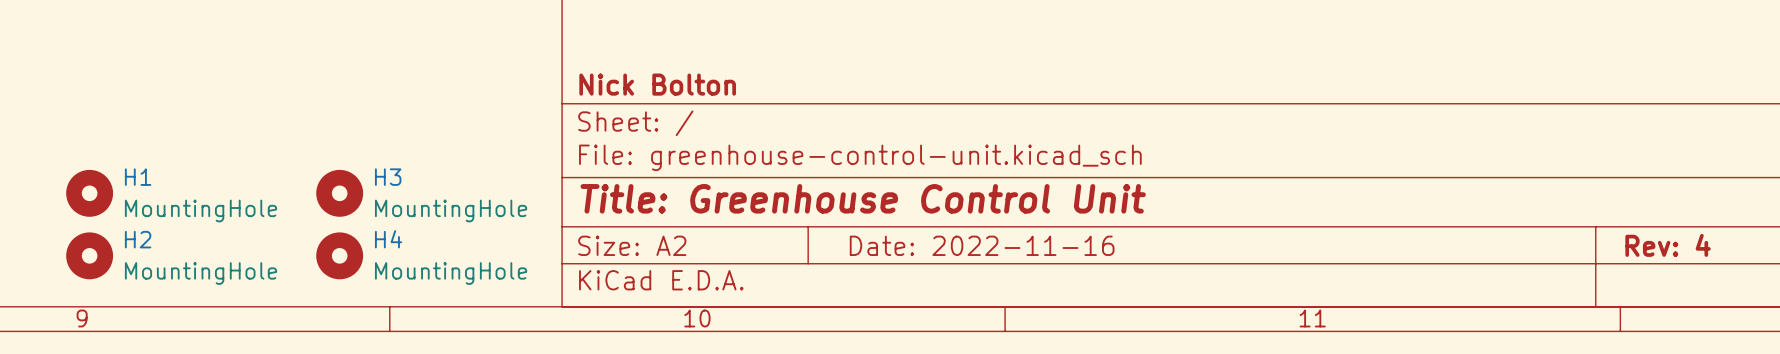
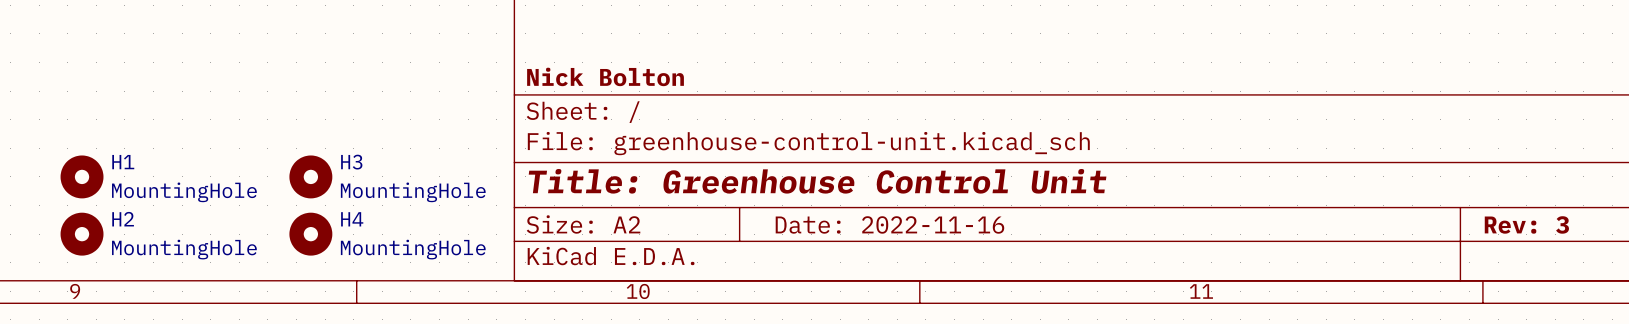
title block: Rev: 4 (1668, 245) -> Rev: 3 (1526, 224)

